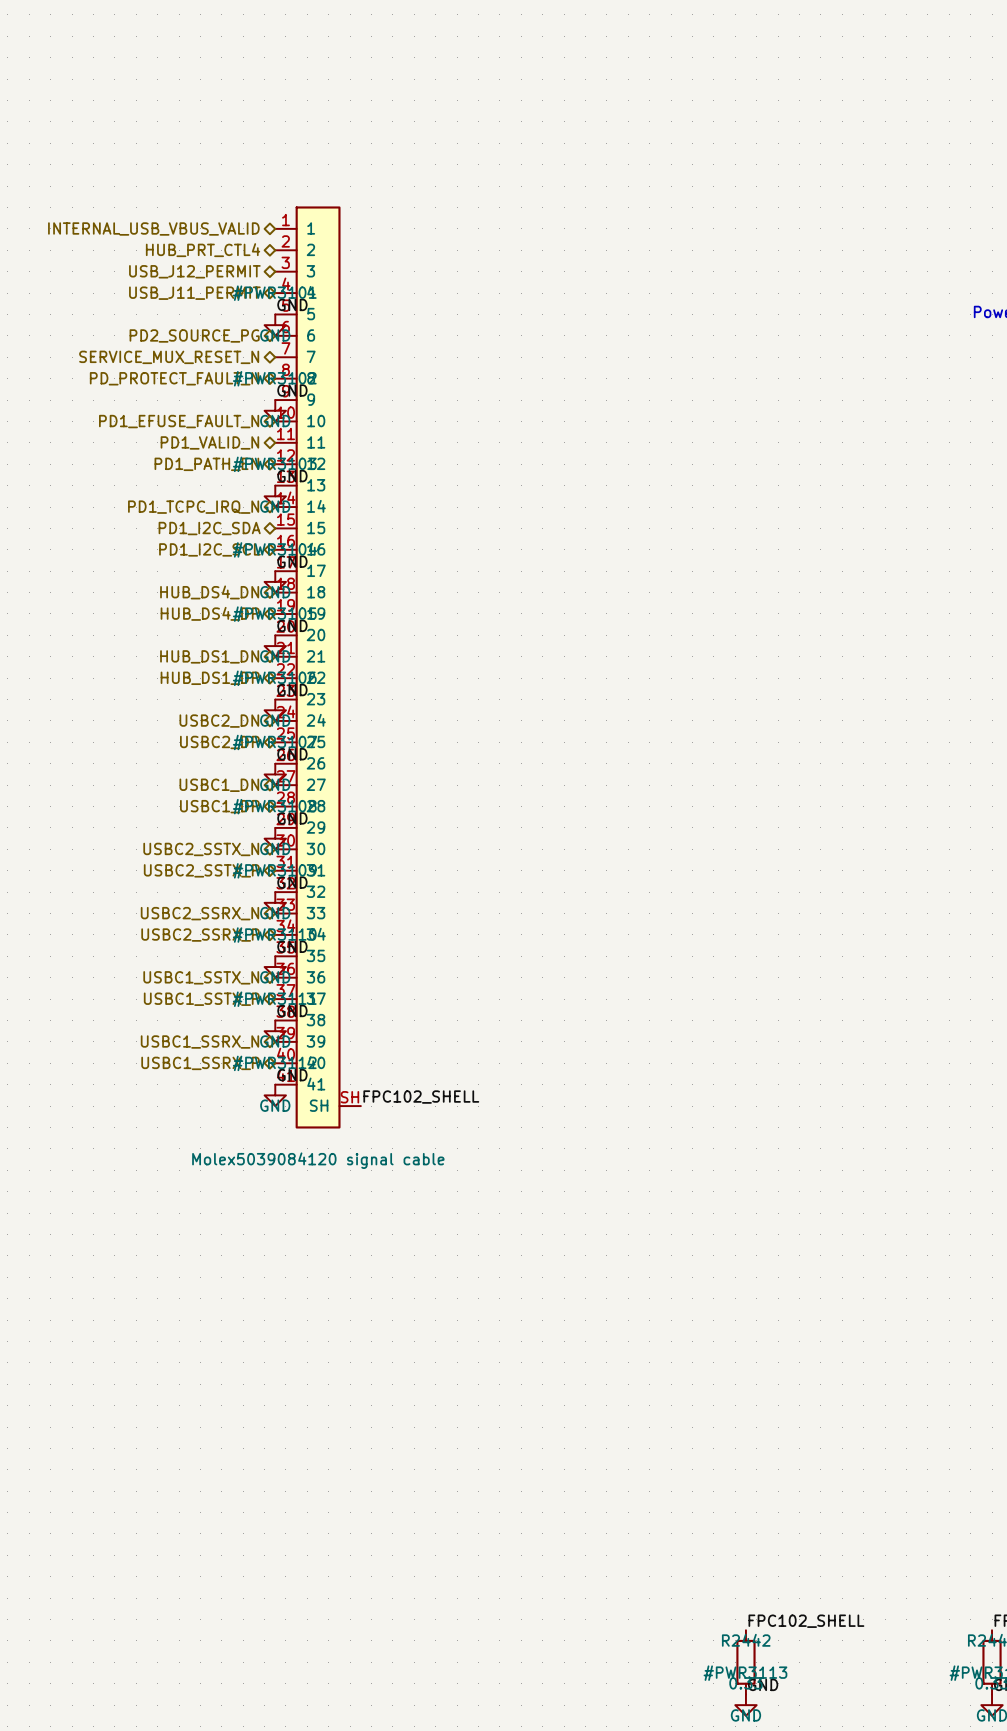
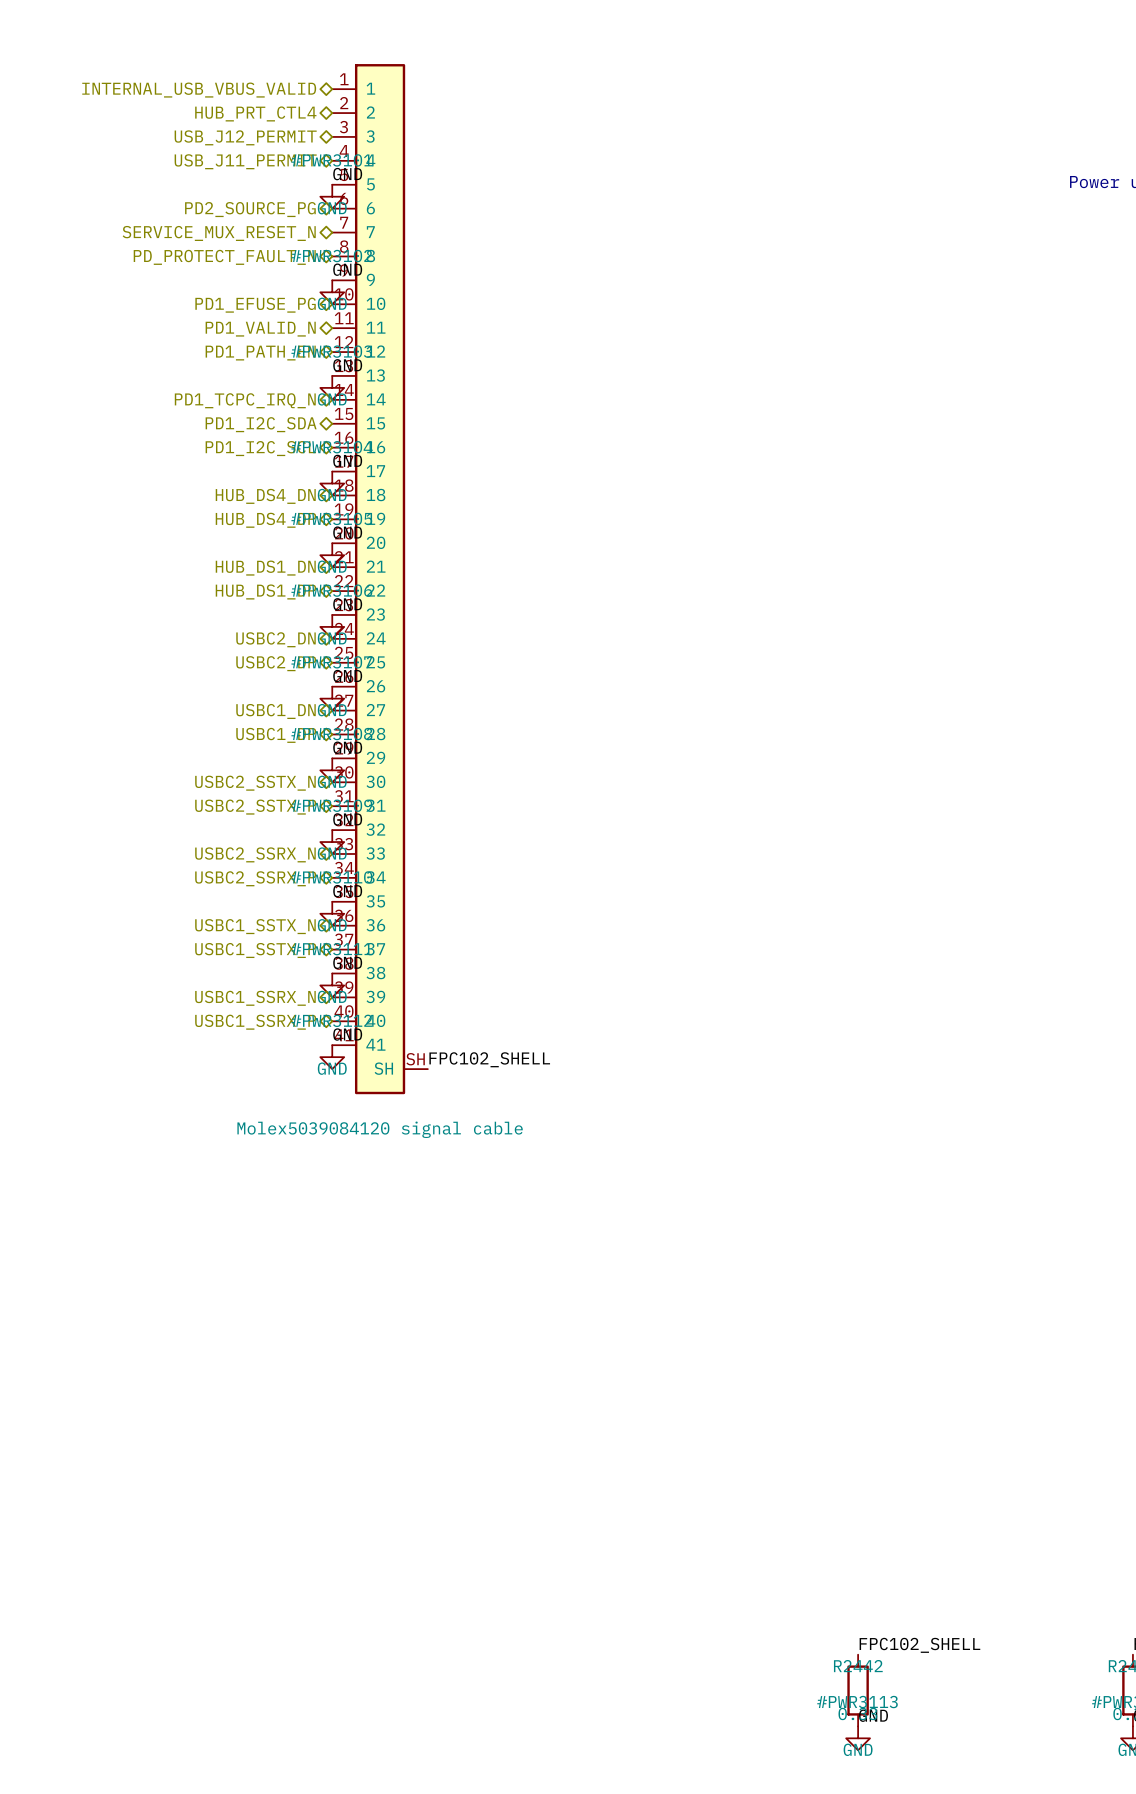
hierarchical label: PD1_EFUSE_FAULT_N (179, 421) -> PD1_EFUSE_PG (255, 305)

